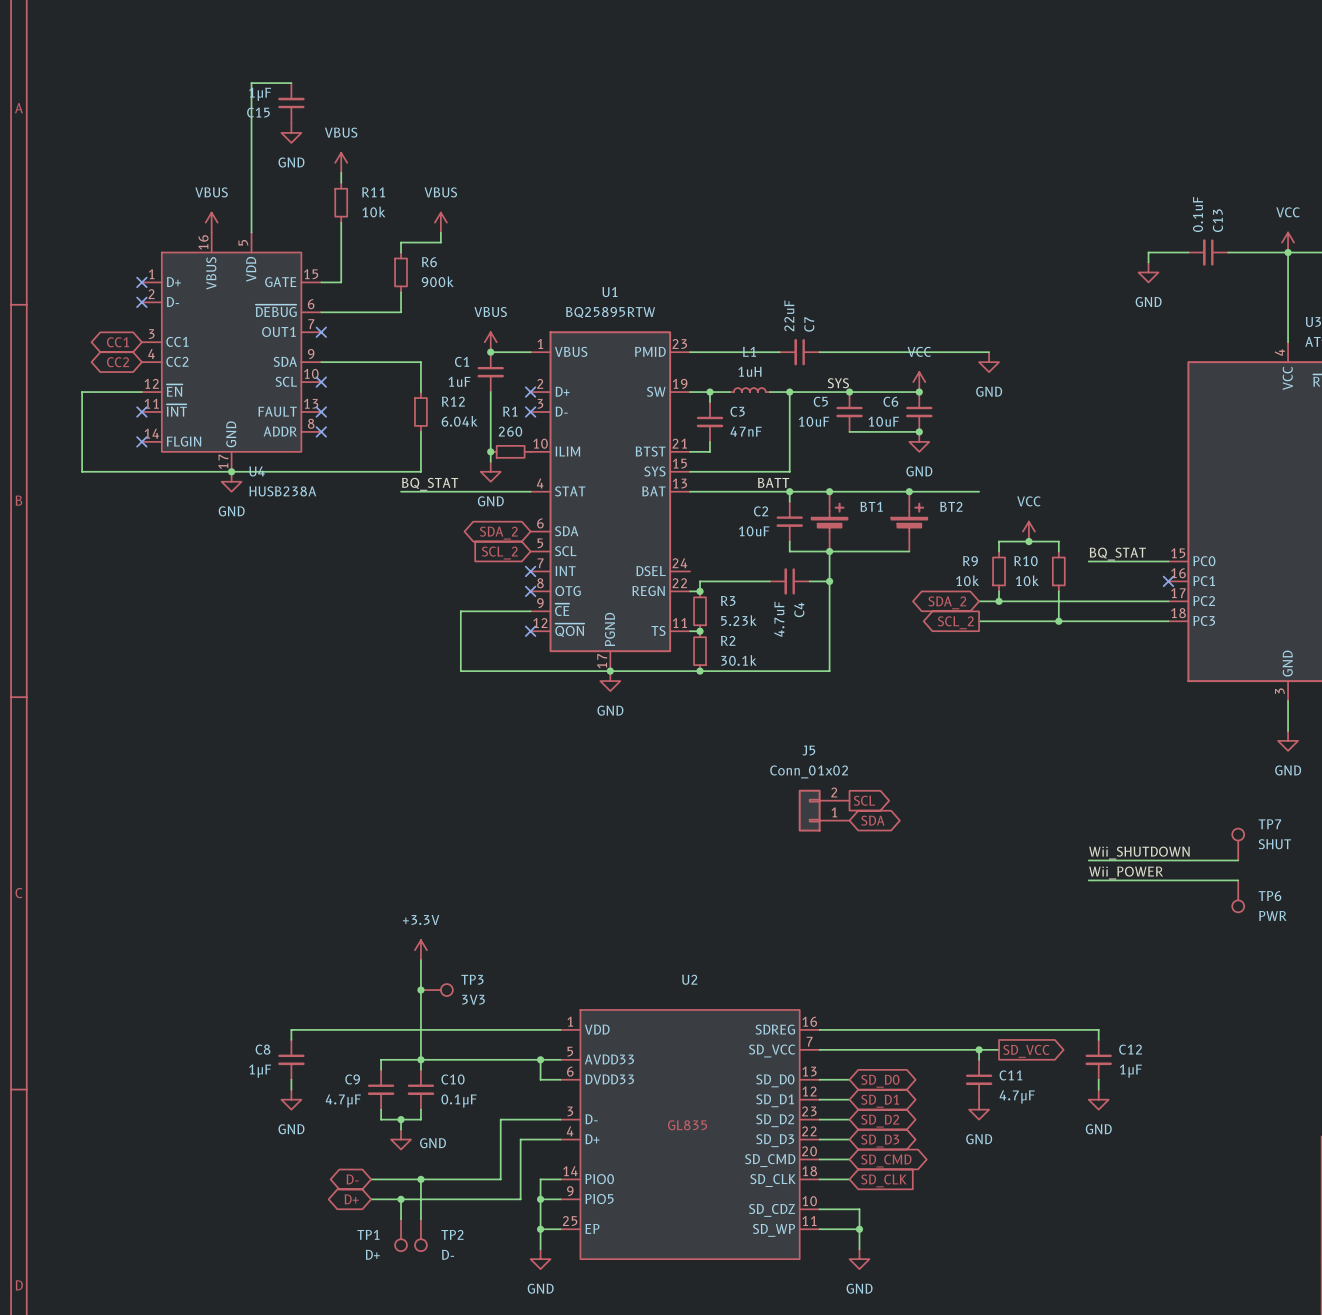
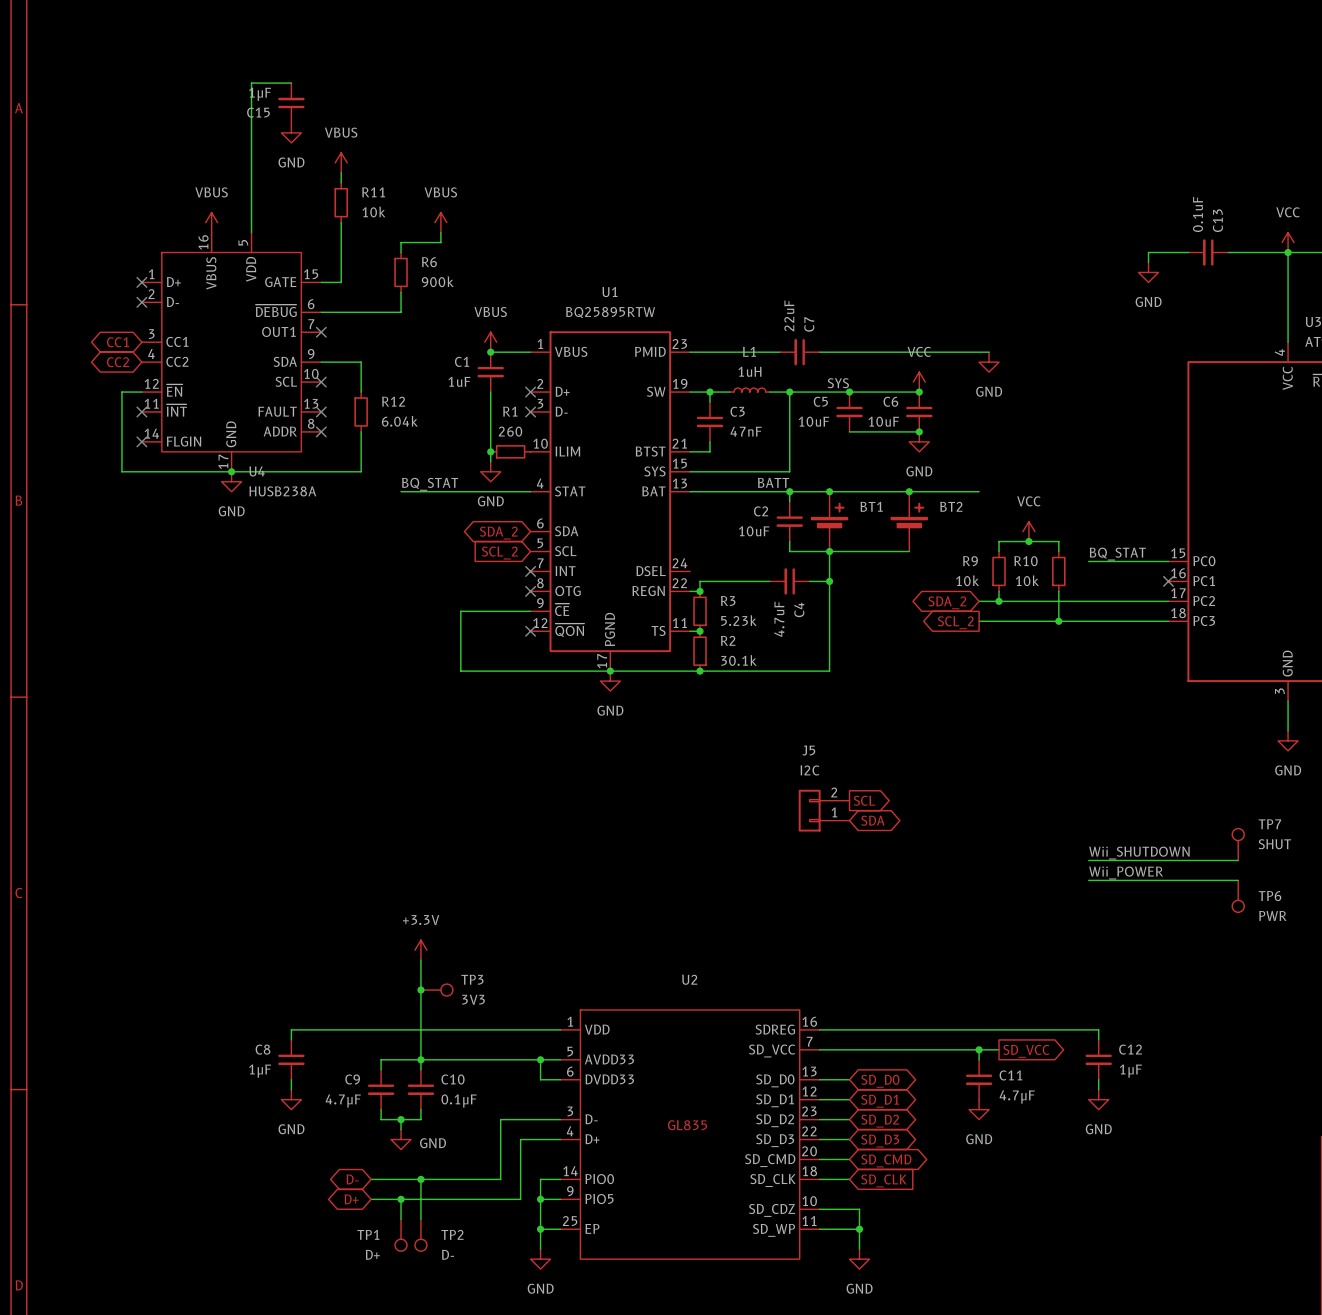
wire: (361, 362) (420, 362) (420, 392) -> (361, 362) (361, 392)
wire: (121, 392) (82, 392) (82, 471) (121, 471) -> (121, 392) (121, 471)
R12 position: (420, 411) -> (361, 411)
wire: (420, 431) (420, 471) (361, 471) -> (361, 431) (361, 471)
J5 value: Conn_01x02 (809, 771) -> I2C (809, 770)

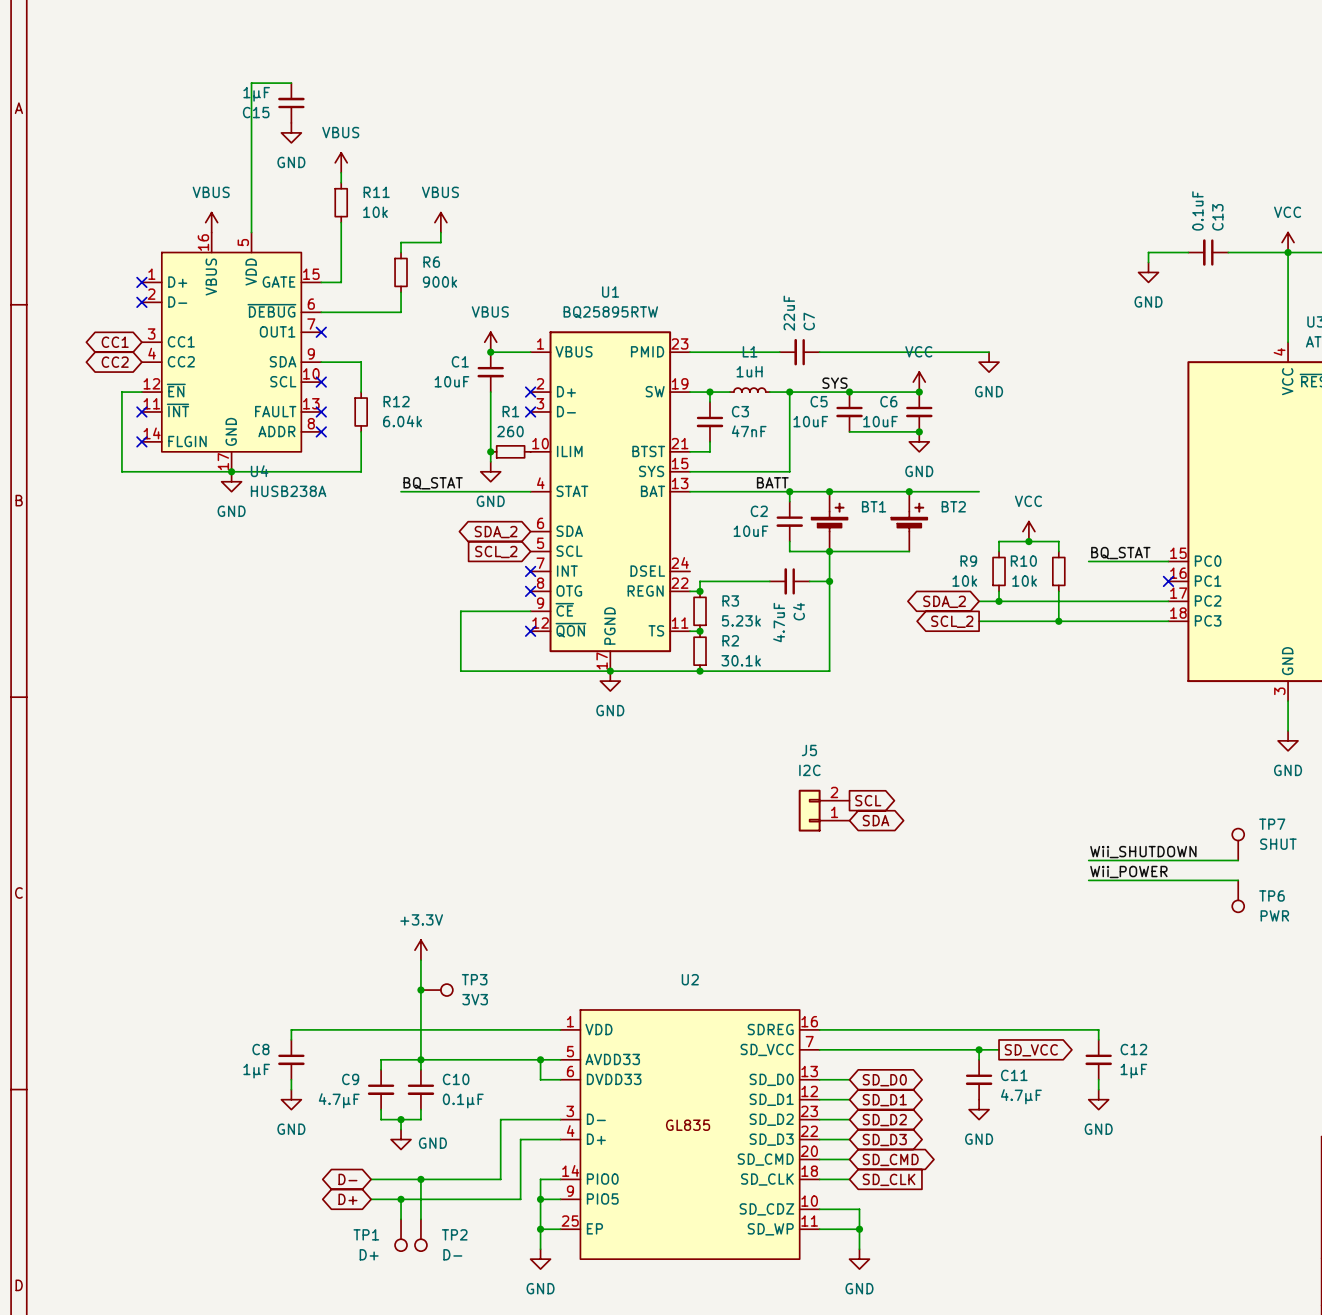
C1 value: 1uF (459, 381) -> 10uF (451, 381)

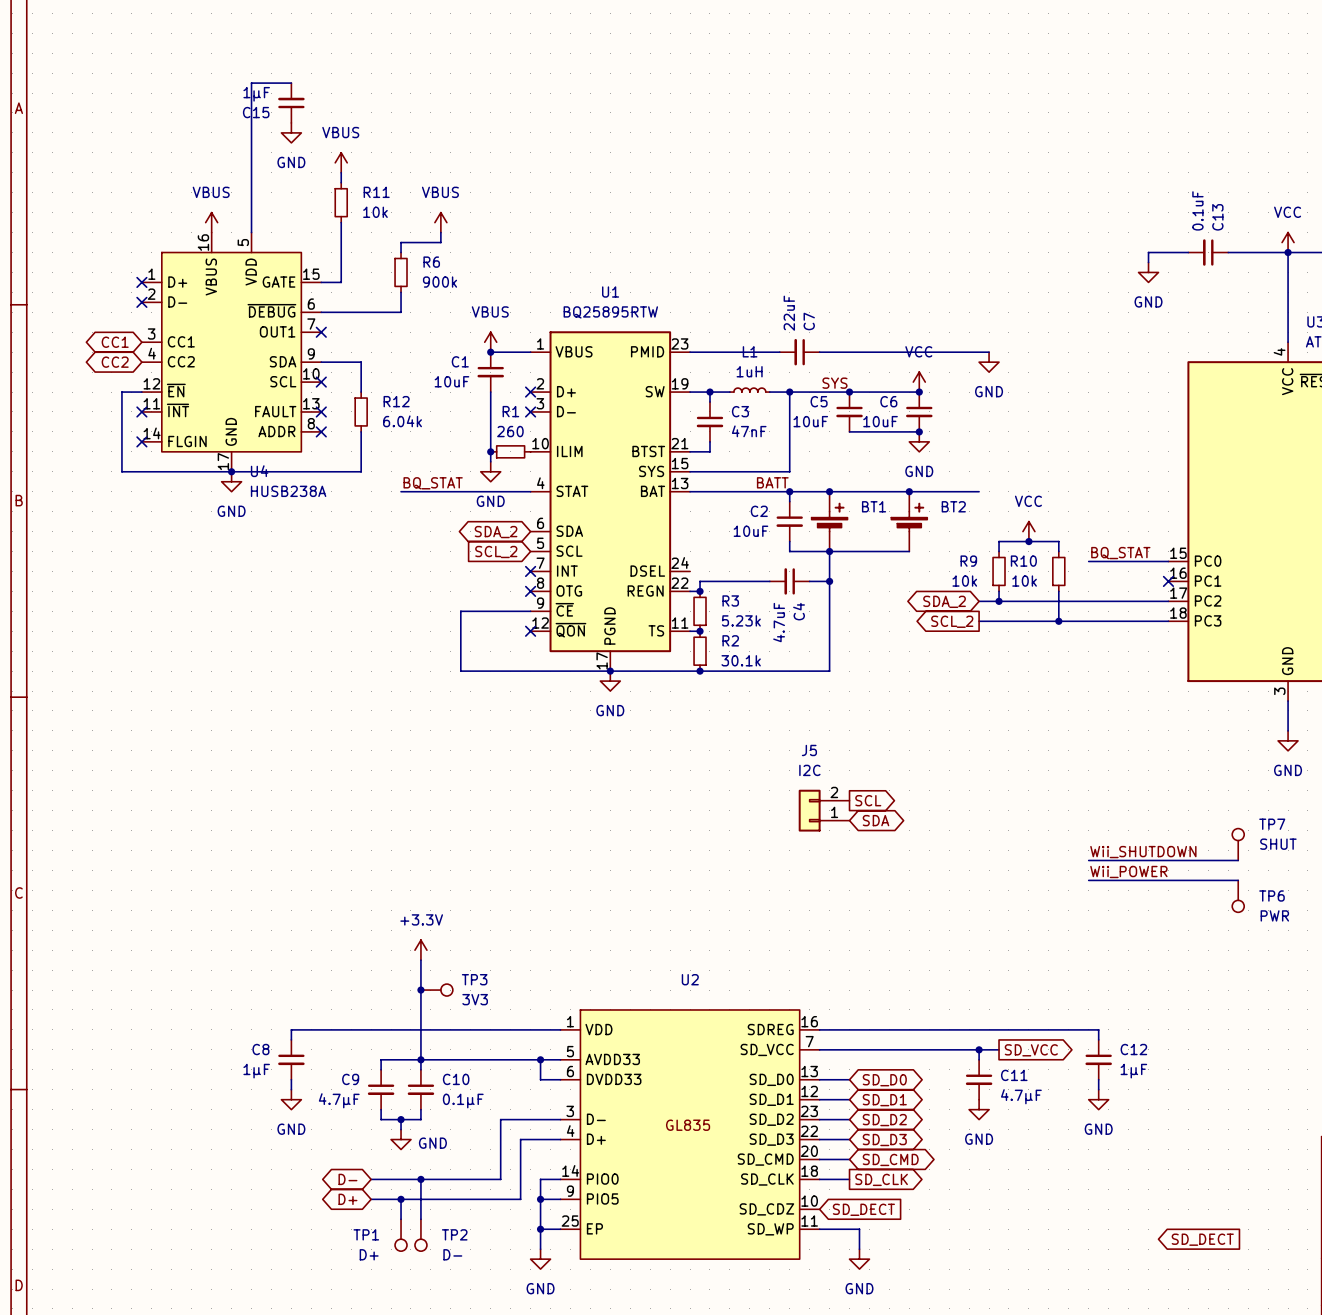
global label shape: input (889, 1179) -> output (881, 1179)
wire: (819, 1209) (859, 1209) (859, 1229) -> none
global label: none -> SD_DECT (863, 1209)
junction: (859, 1229) -> none
global label: none -> SD_DECT (1202, 1239)

